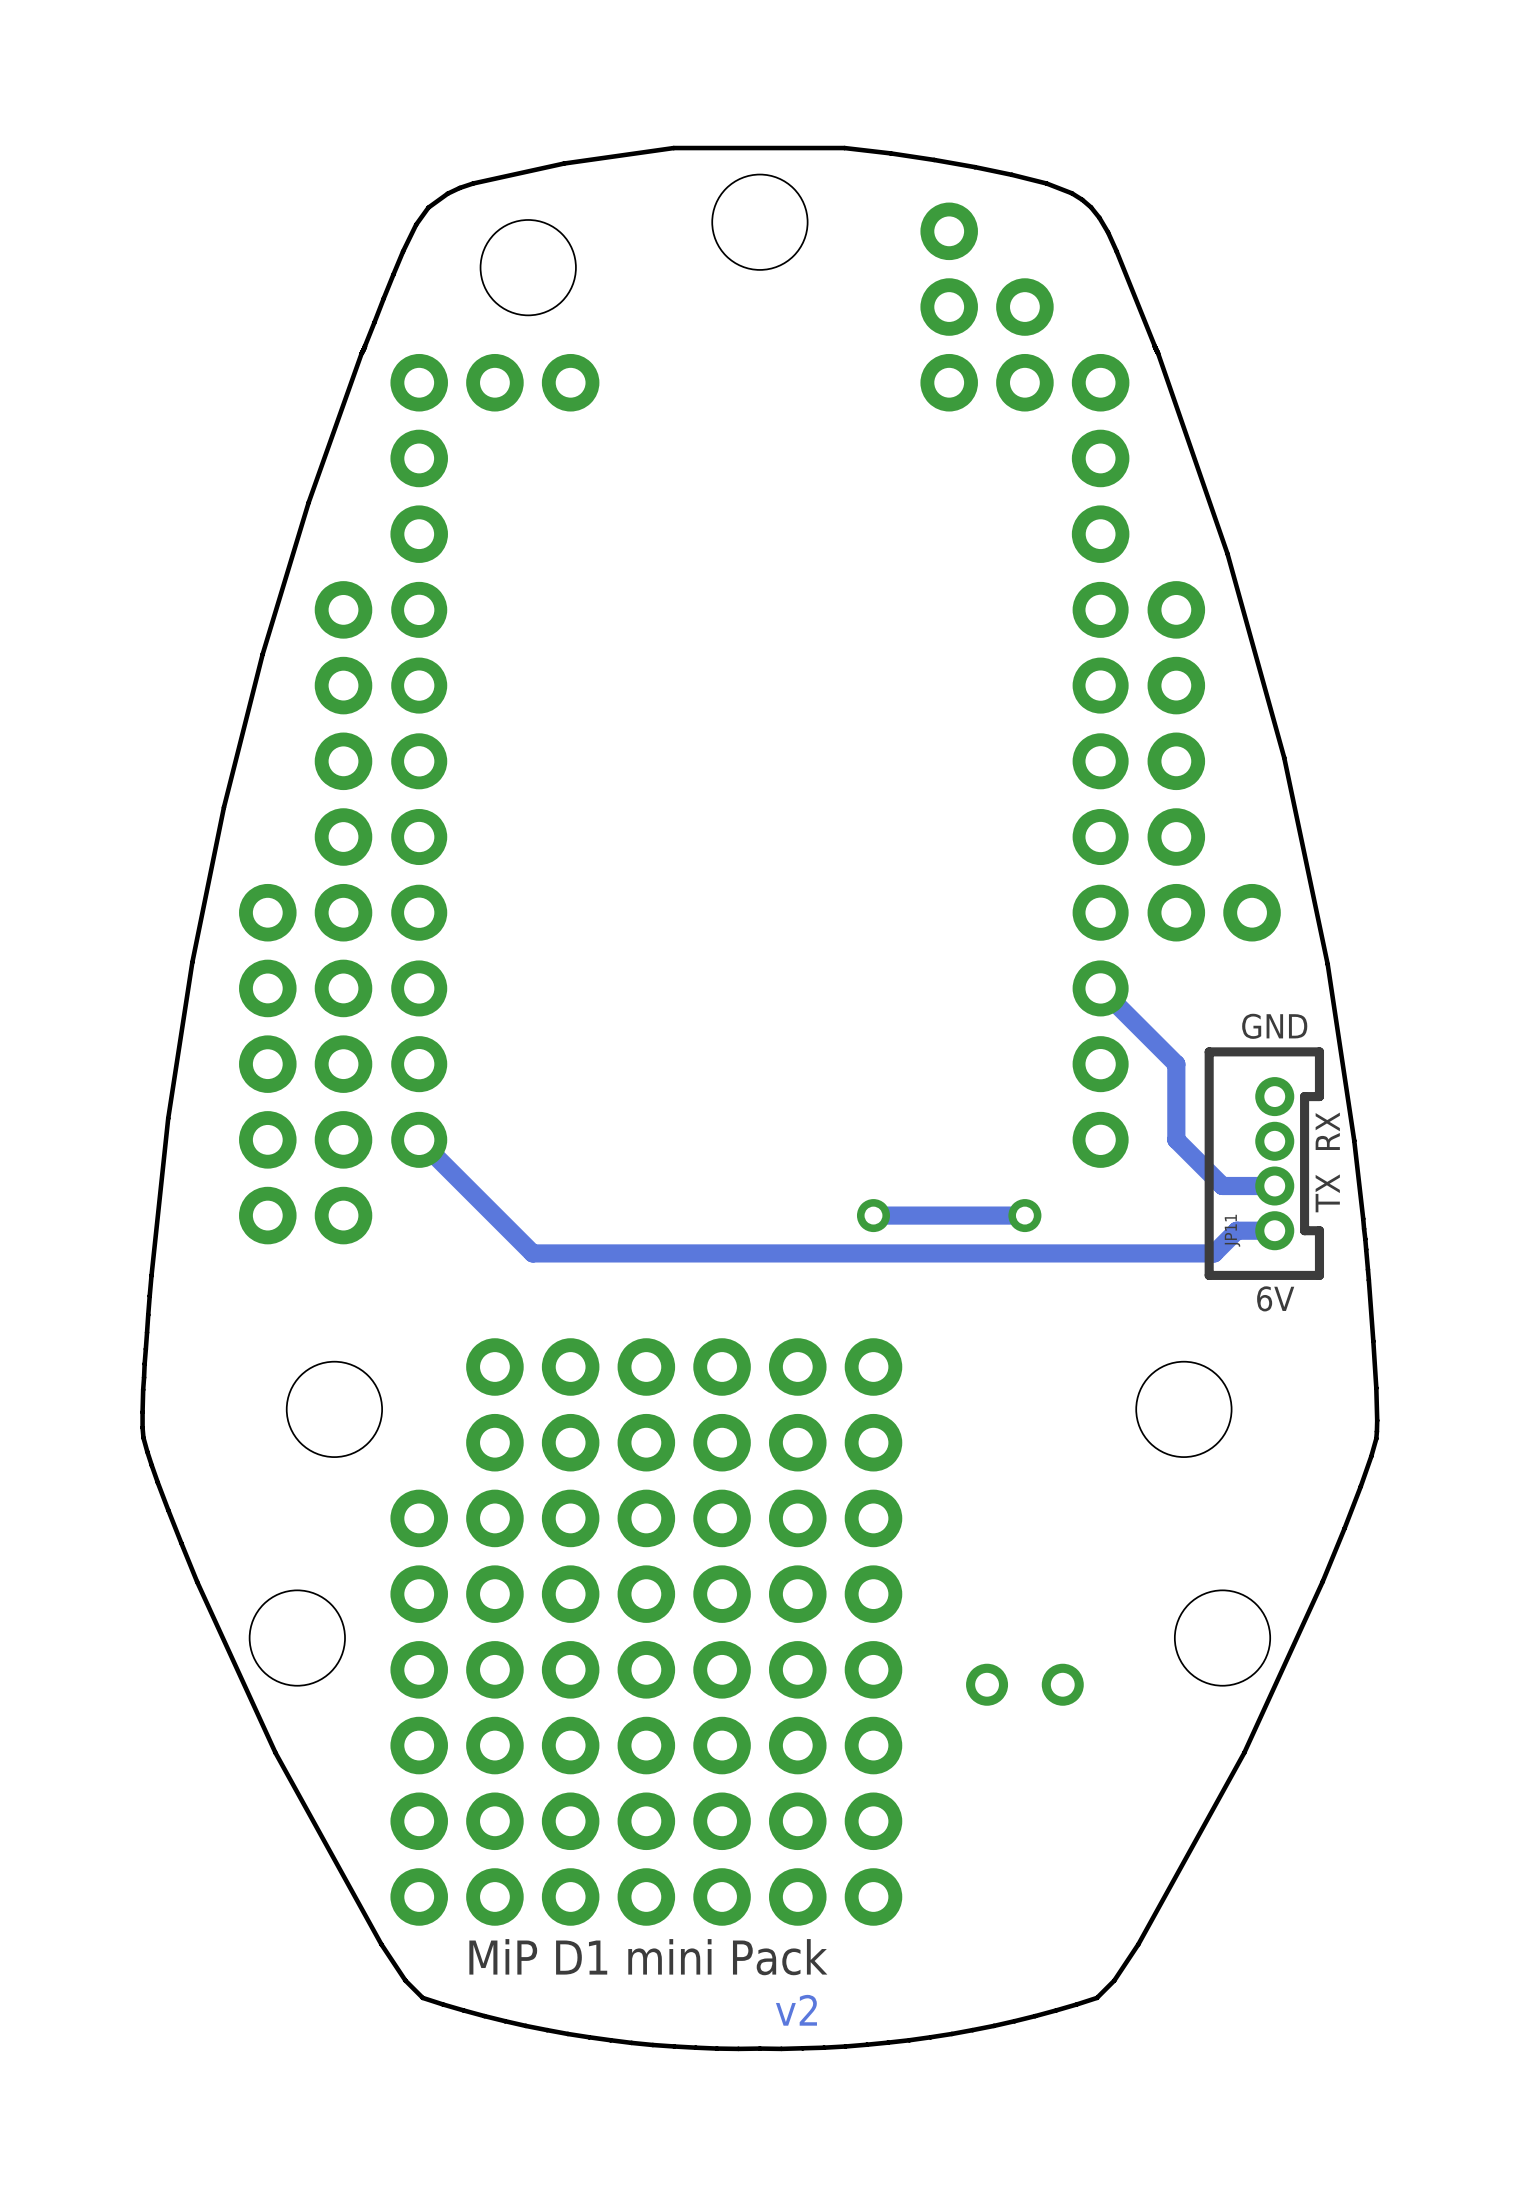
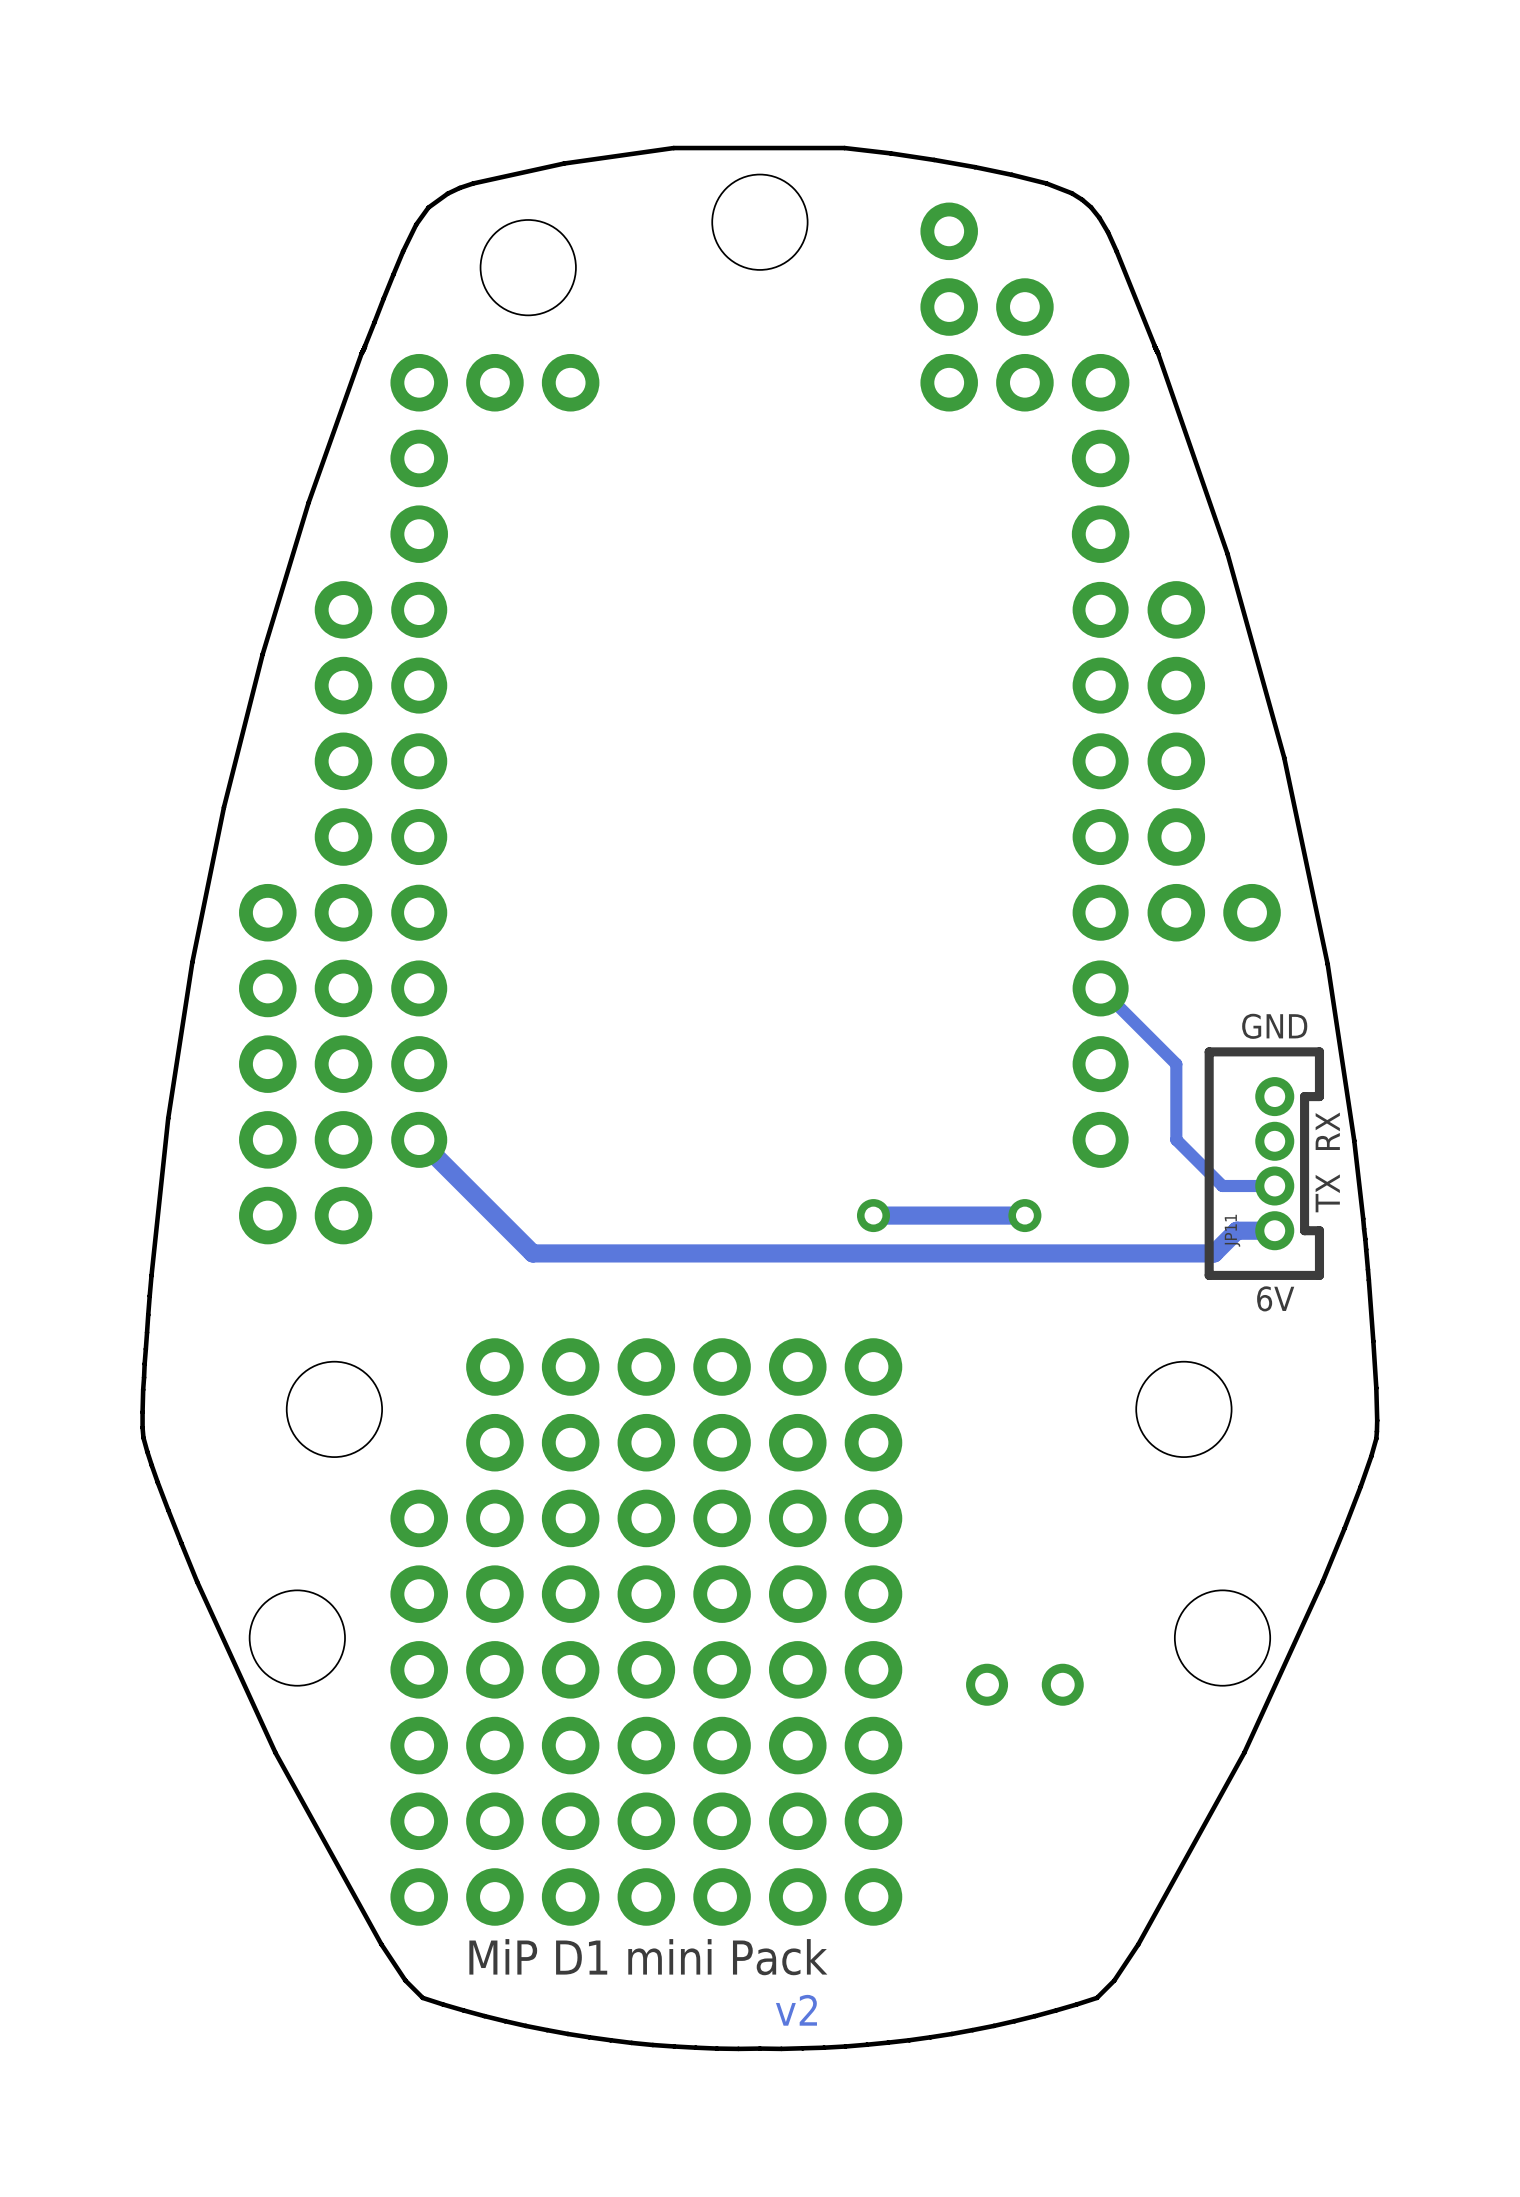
track width: thick (1100, 988) (1176, 1064) (1176, 1139) (1222, 1186) (1274, 1186) -> thin (1100, 988) (1176, 1064) (1176, 1139) (1222, 1186) (1274, 1186)

